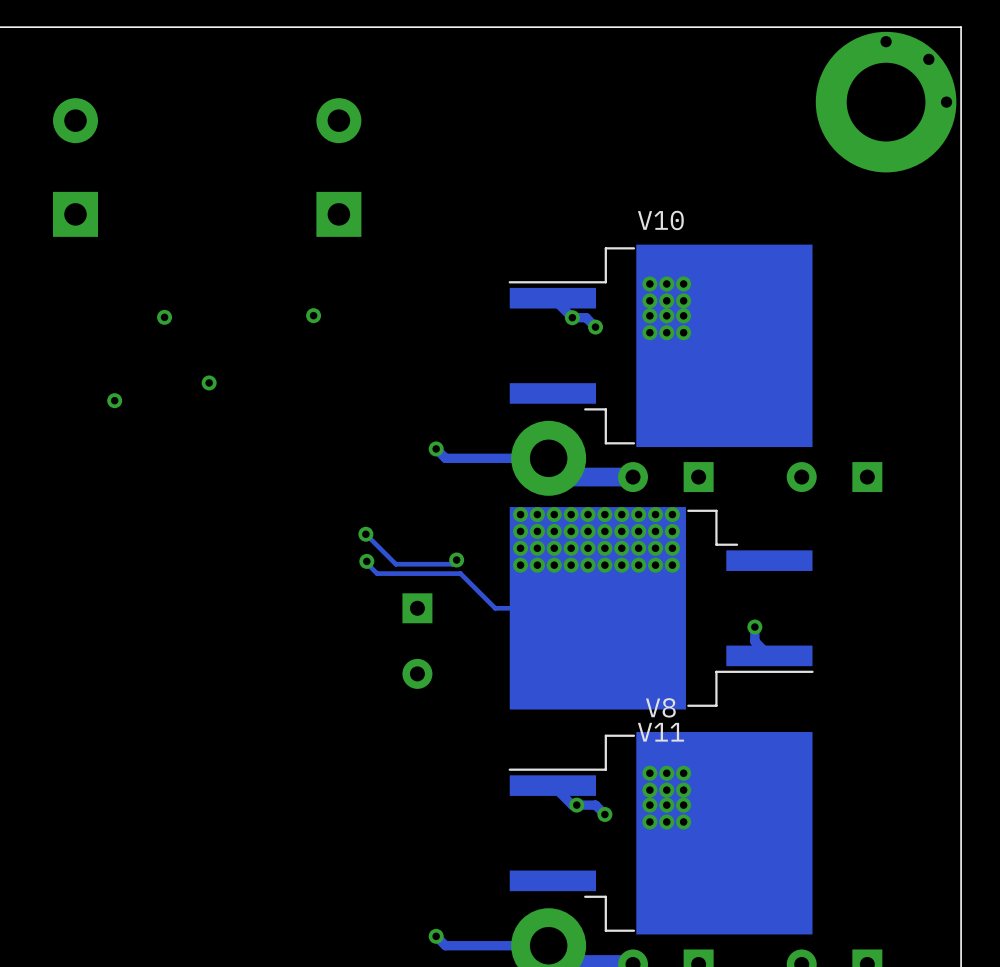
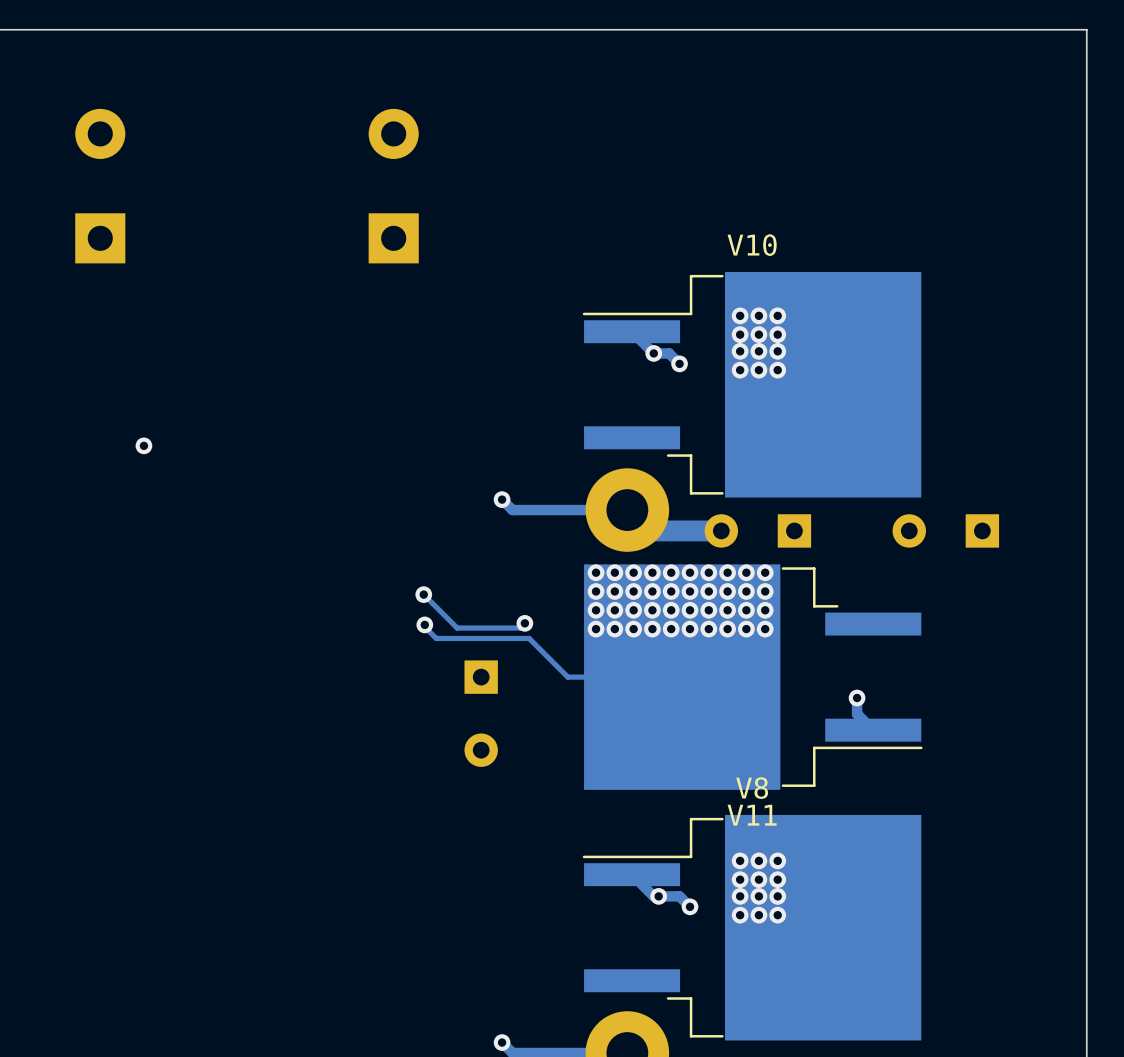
part: (886, 102) -> none
via: (313, 315) -> none
via: (164, 317) -> none
via: (209, 382) -> none

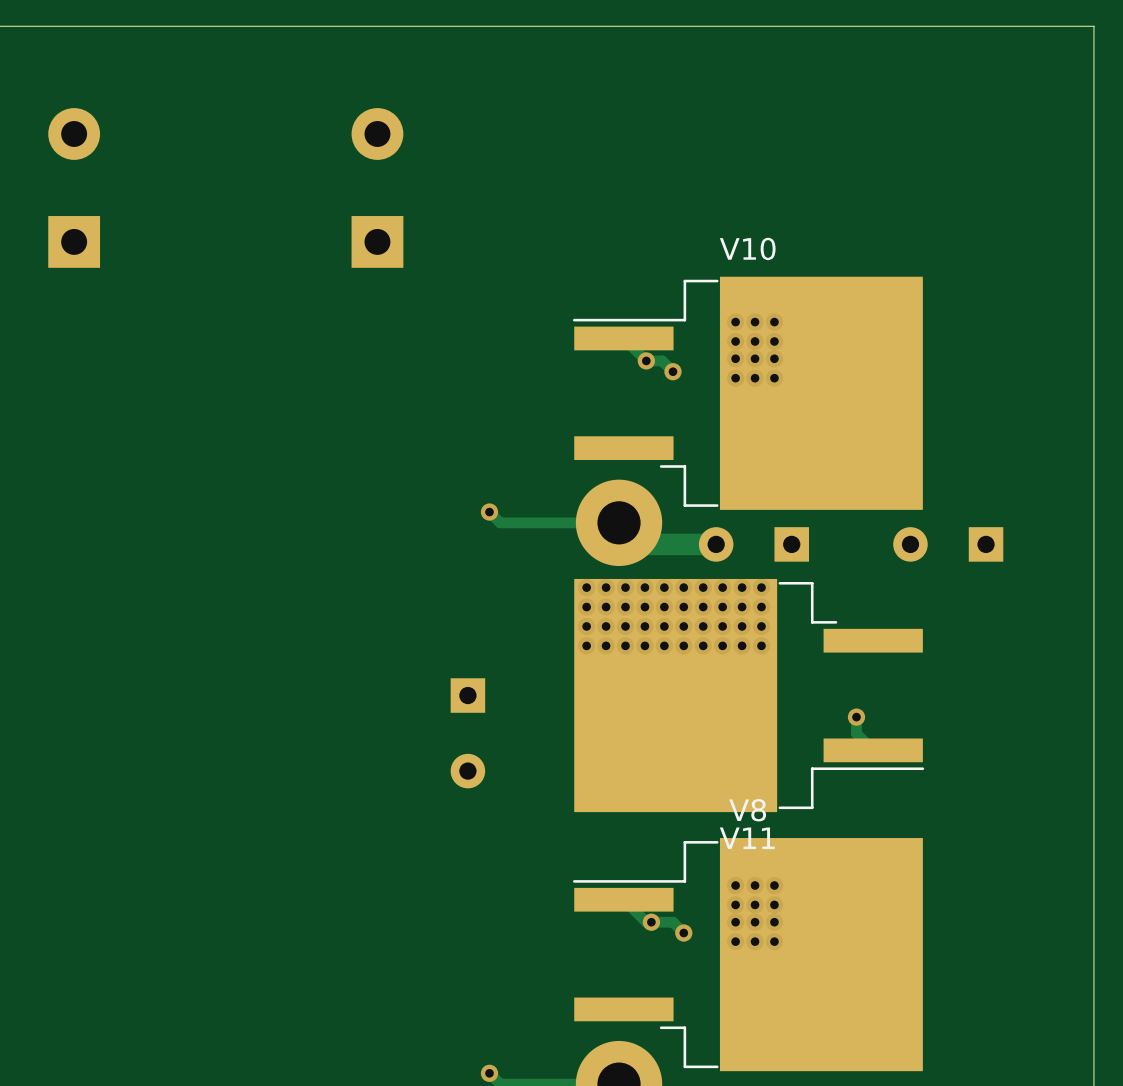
via: (143, 445) -> none
track: (423, 594) (457, 628) (520, 628) (524, 623) -> none
via: (423, 594) -> none
via: (524, 623) -> none
track: (424, 624) (436, 638) (529, 638) (567, 677) (682, 677) -> none
via: (424, 624) -> none

